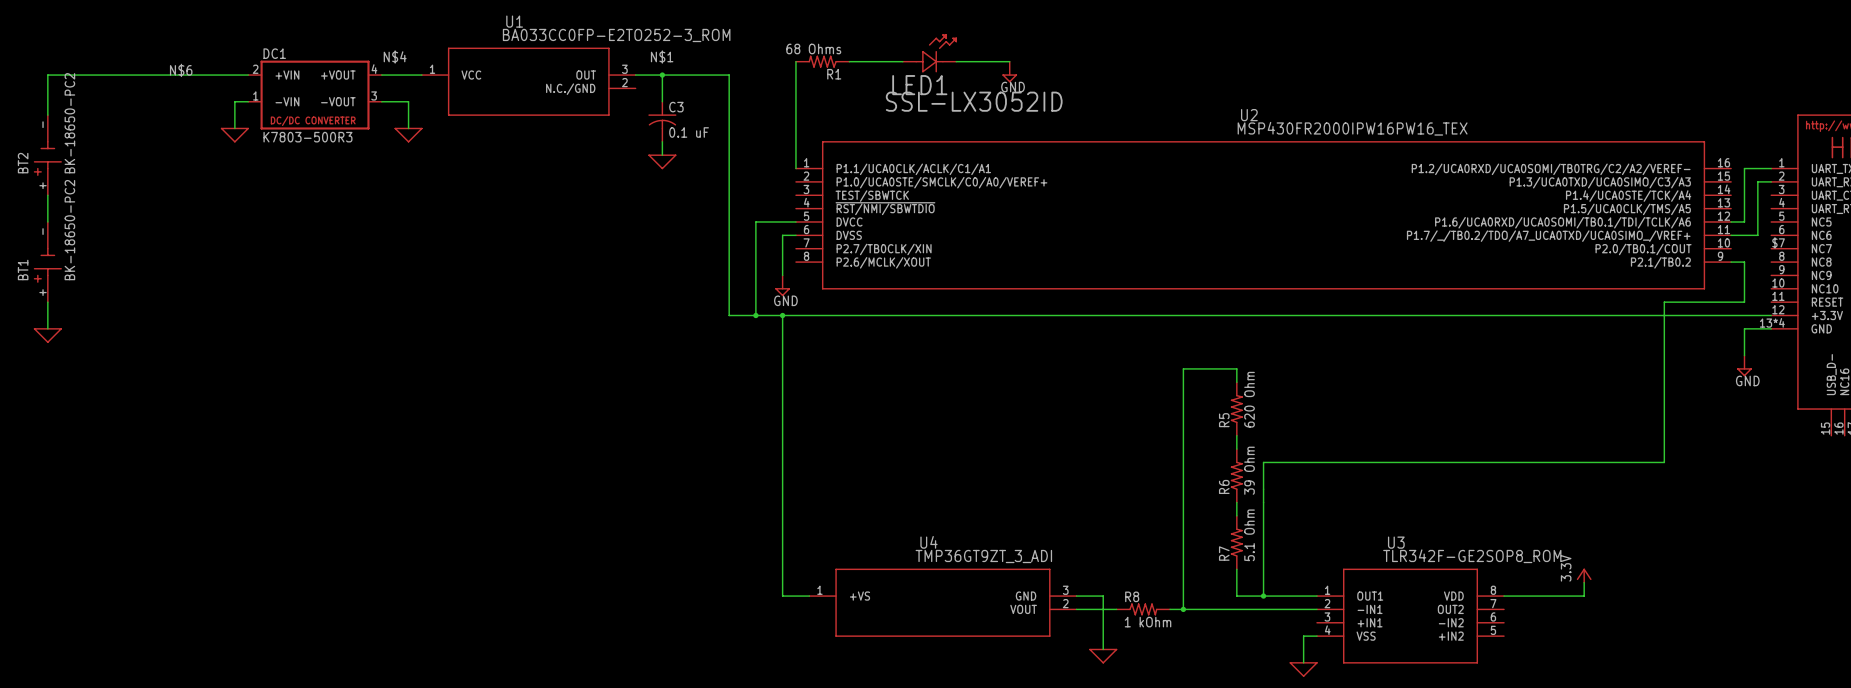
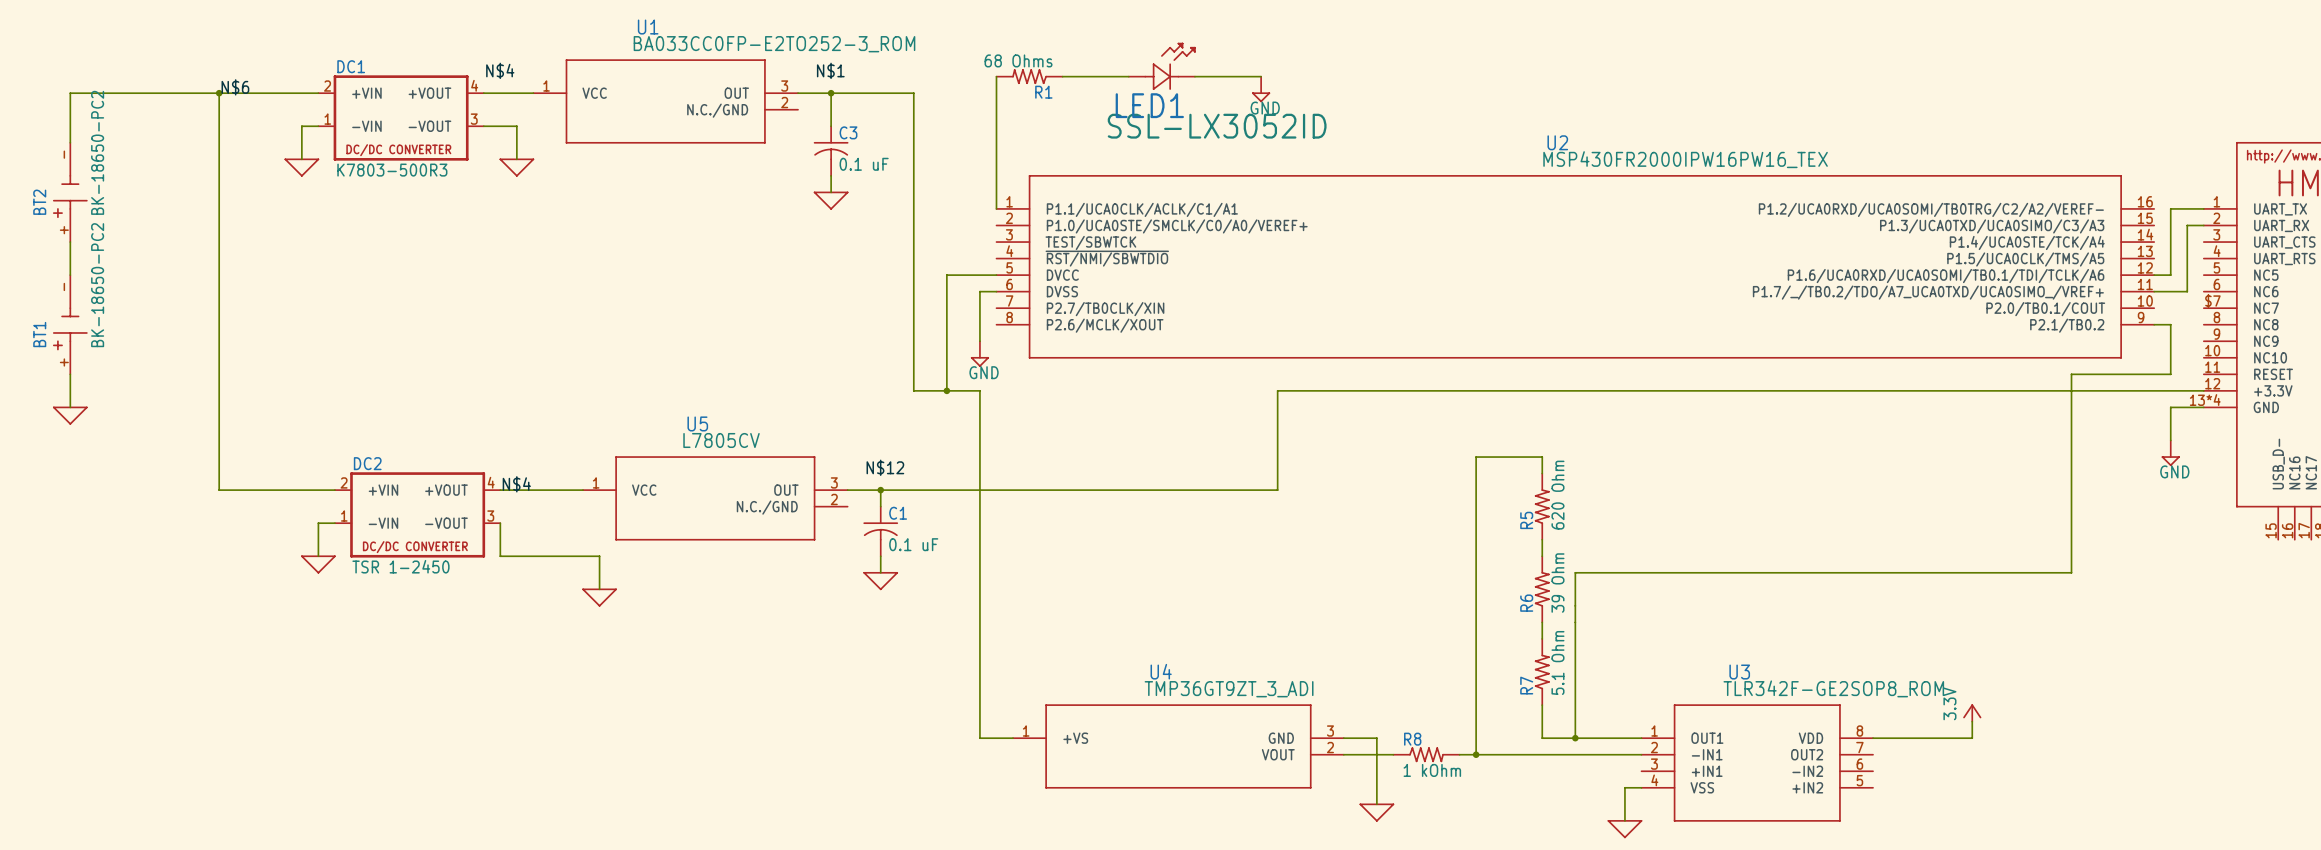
wire: none -> (219, 93) (219, 490) (334, 490)
junction: none -> (219, 93)
wire: (782, 315) (1023, 315) -> (847, 490) (1277, 490) (1277, 390)
junction: (782, 315) -> none
label: none -> N$12 (885, 467)
label: none -> N$4 (516, 484)
wire: none -> (500, 490) (583, 490)
wire: none -> (880, 490) (880, 506)
junction: none -> (880, 490)
U5: none -> L7805CV (715, 498)
DC2: none -> TSR 1-2450 (417, 514)
wire: none -> (334, 523) (318, 523) (318, 556)
wire: none -> (500, 523) (500, 556) (599, 556) (599, 589)
C1: none -> 0.1 uF (880, 531)
wire: none -> (880, 556) (880, 572)
power symbol: none -> (318, 564)
power symbol: none -> (880, 581)
power symbol: none -> (599, 597)

